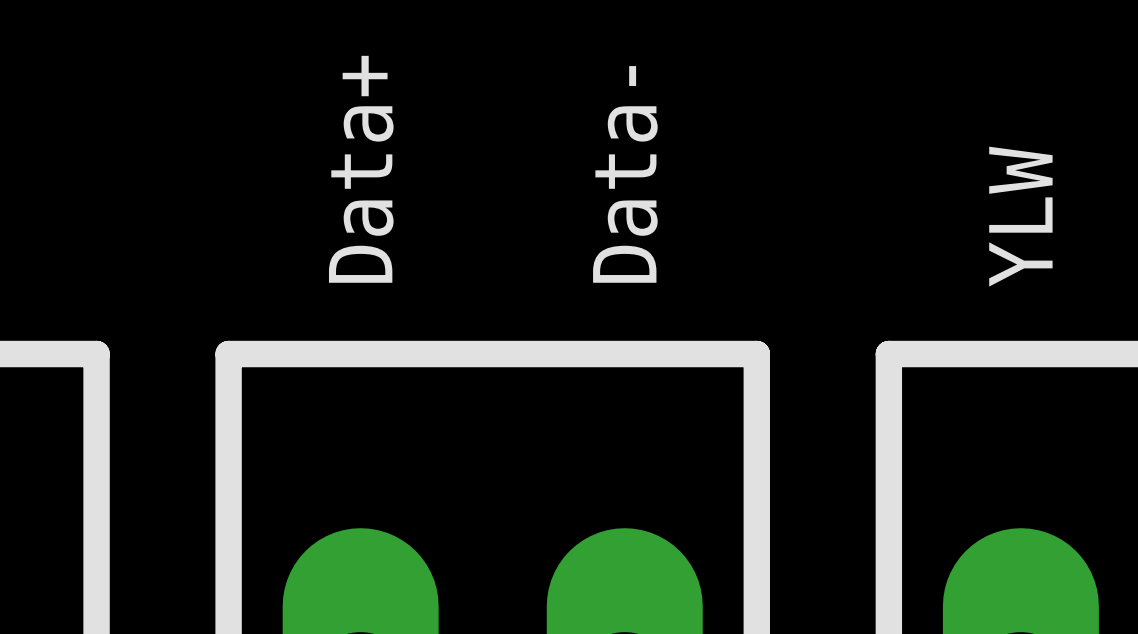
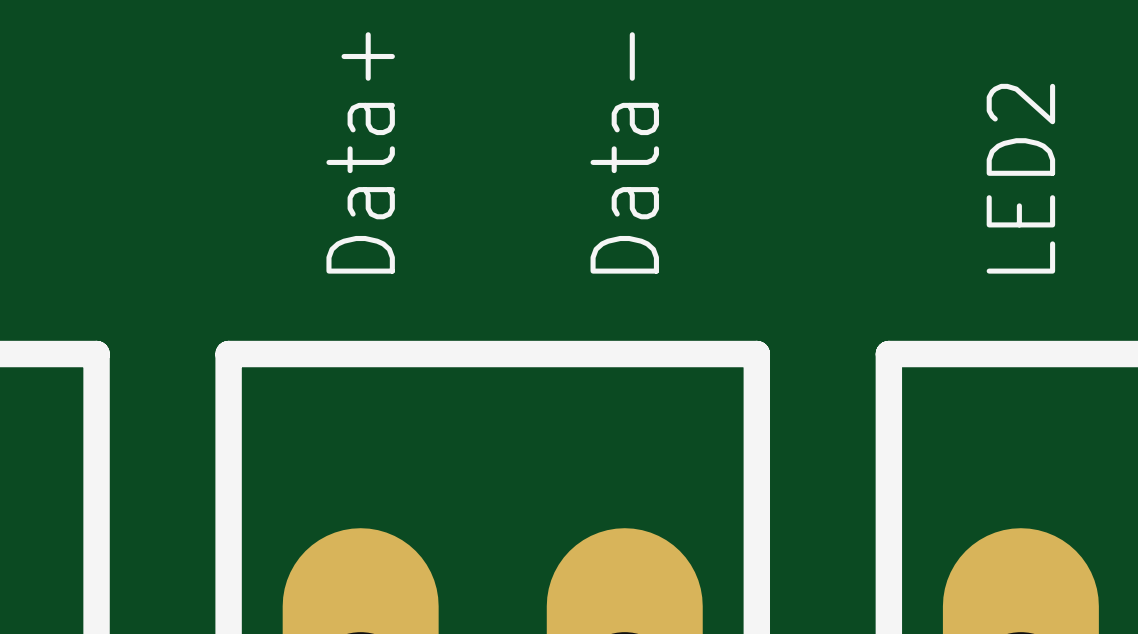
text: YLW (1020, 216) -> LED2 (1020, 178)

